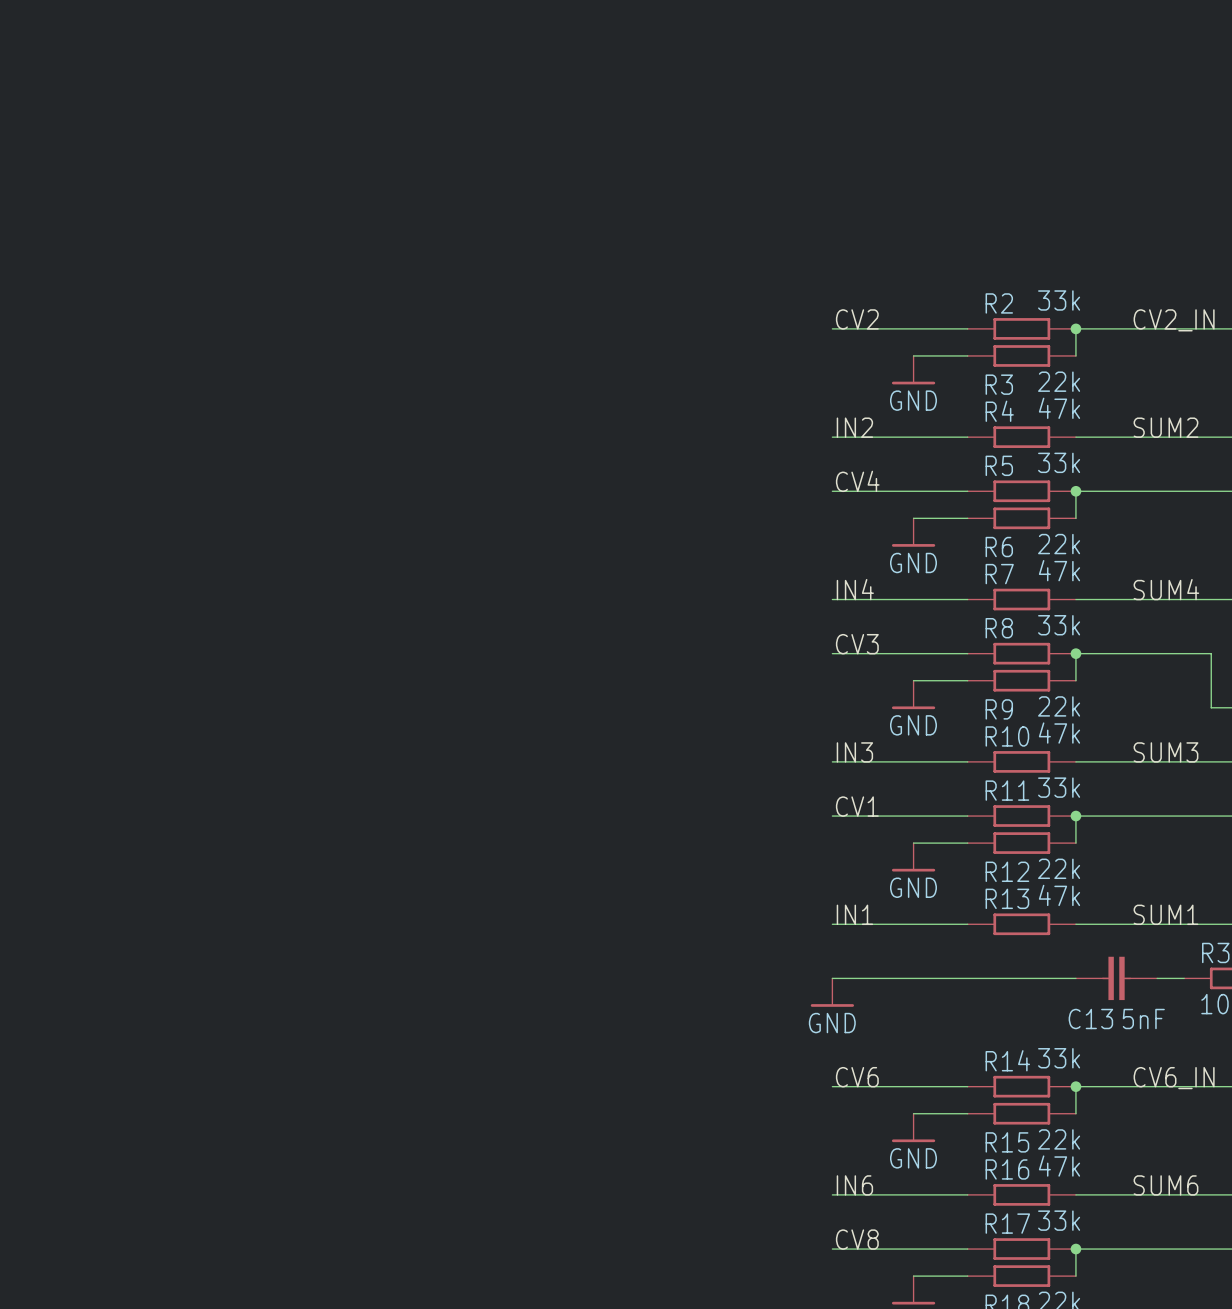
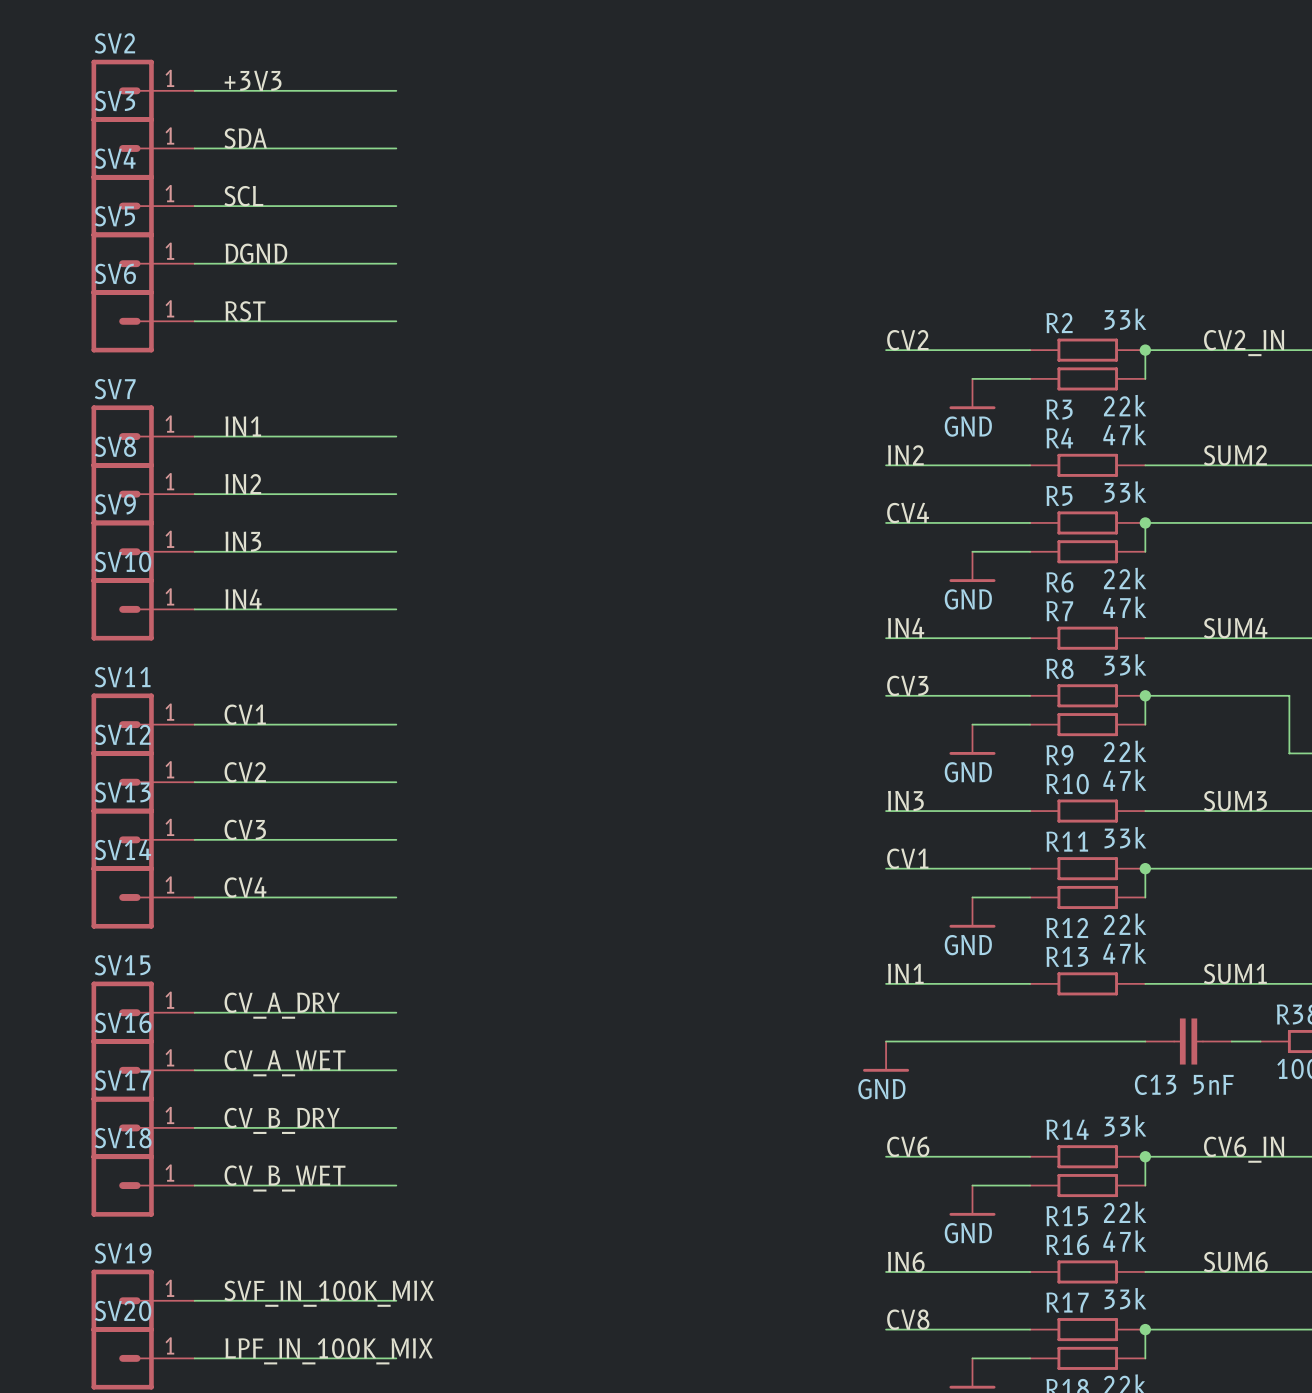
label: none -> +3V3 (253, 80)
SV2: none -> (143, 90)
wire: none -> (194, 90) (396, 90)
label: none -> SDA (245, 138)
SV3: none -> (143, 148)
wire: none -> (194, 148) (396, 148)
label: none -> SCL (243, 196)
SV4: none -> (143, 206)
wire: none -> (194, 206) (396, 206)
label: none -> DGND (256, 253)
SV5: none -> (143, 263)
wire: none -> (194, 263) (396, 263)
label: none -> RST (245, 311)
SV6: none -> (143, 321)
wire: none -> (194, 321) (396, 321)
label: none -> IN1 (243, 426)
SV7: none -> (143, 436)
wire: none -> (194, 436) (396, 436)
label: none -> IN2 (243, 484)
SV8: none -> (143, 494)
wire: none -> (194, 494) (396, 494)
label: none -> IN3 (243, 541)
SV9: none -> (143, 551)
wire: none -> (194, 551) (396, 551)
label: none -> IN4 (243, 599)
SV10: none -> (143, 609)
wire: none -> (194, 609) (396, 609)
label: none -> CV1 (245, 714)
SV11: none -> (143, 724)
wire: none -> (194, 724) (396, 724)
label: none -> CV2 (245, 772)
SV12: none -> (143, 782)
wire: none -> (194, 782) (396, 782)
label: none -> CV3 (245, 829)
SV13: none -> (143, 839)
wire: none -> (194, 839) (396, 839)
label: none -> CV4 (245, 887)
SV14: none -> (143, 897)
wire: none -> (194, 897) (396, 897)
label: none -> CV_A_DRY (282, 1005)
SV15: none -> (143, 1012)
wire: none -> (194, 1012) (396, 1012)
label: none -> CV_A_WET (285, 1063)
SV16: none -> (143, 1070)
wire: none -> (194, 1070) (396, 1070)
label: none -> CV_B_DRY (282, 1120)
SV17: none -> (143, 1127)
wire: none -> (194, 1127) (396, 1127)
label: none -> CV_B_WET (285, 1178)
SV18: none -> (143, 1185)
wire: none -> (194, 1185) (396, 1185)
label: none -> SVF_IN_100K_MIX (329, 1293)
SV19: none -> (143, 1300)
wire: none -> (194, 1300) (396, 1300)
label: none -> LPF_IN_100K_MIX (329, 1351)
SV20: none -> (143, 1358)
wire: none -> (194, 1358) (396, 1358)

